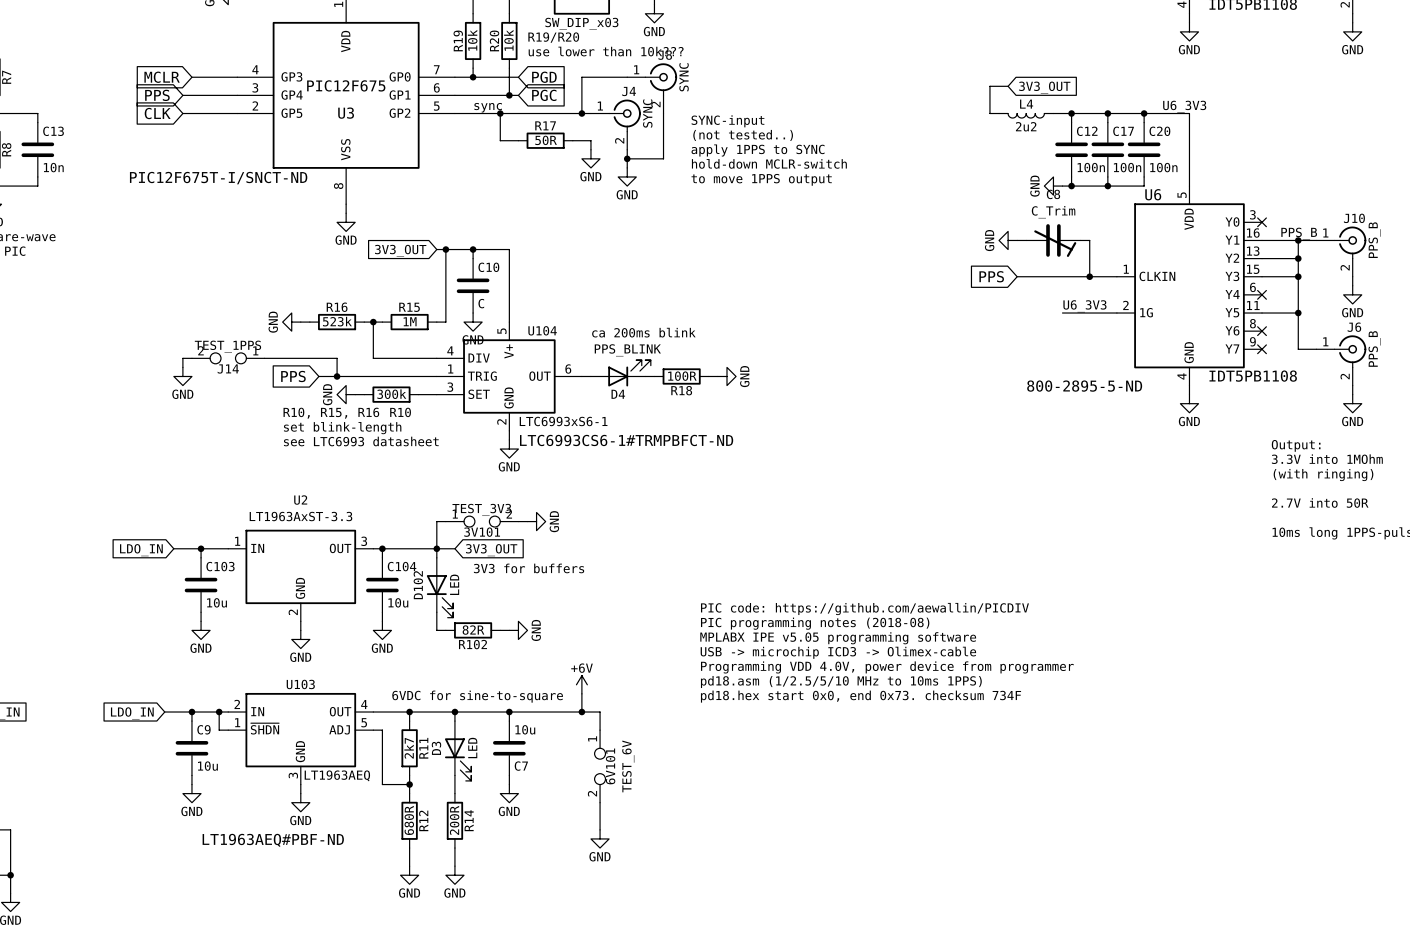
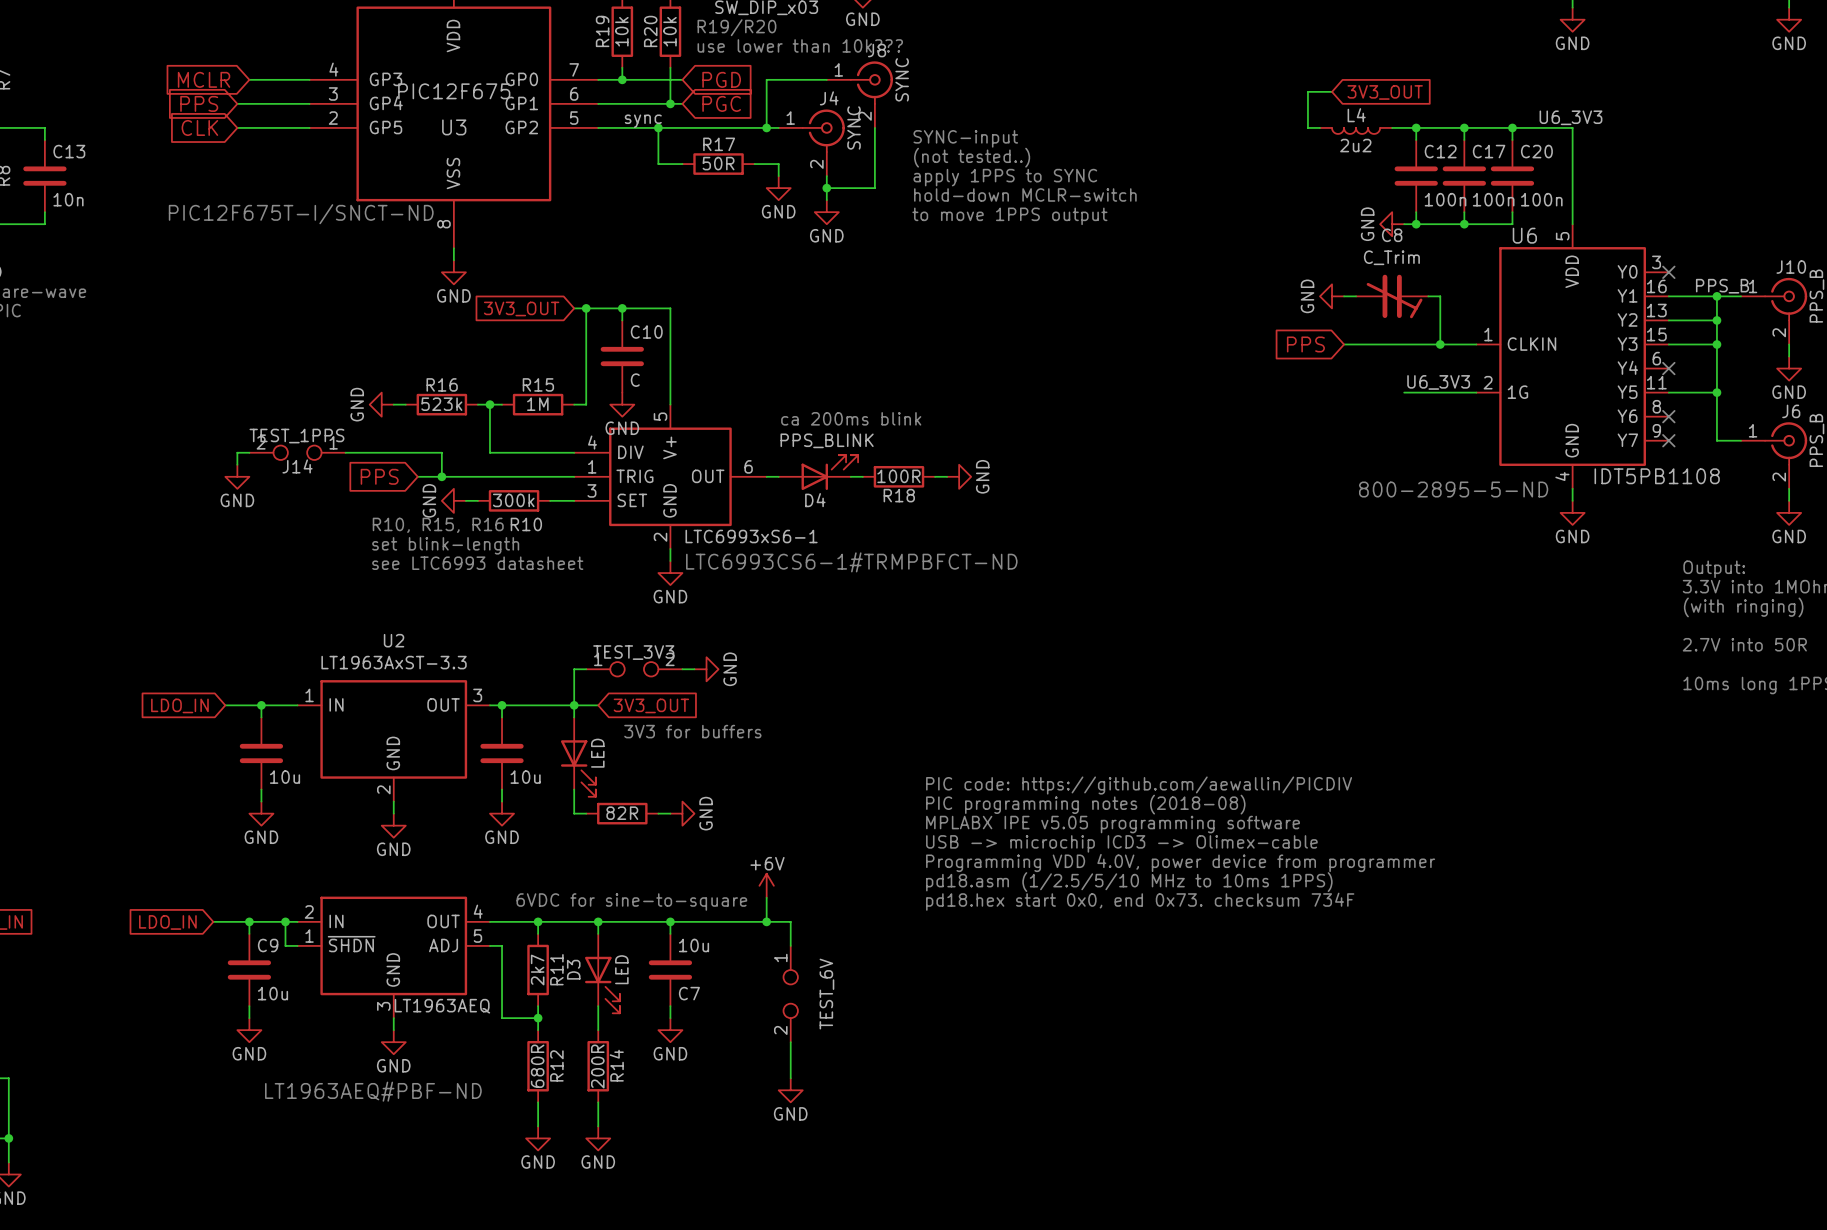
U104 name: U104 (542, 330) -> none
3V101 name: 3V101 (482, 532) -> none
C103 name: C103 (220, 566) -> none
C104 name: C104 (402, 566) -> none
D102 name: D102 (418, 585) -> none
R102 name: R102 (472, 644) -> none
U103 name: U103 (300, 684) -> none
6V101 name: 6V101 (610, 766) -> none

